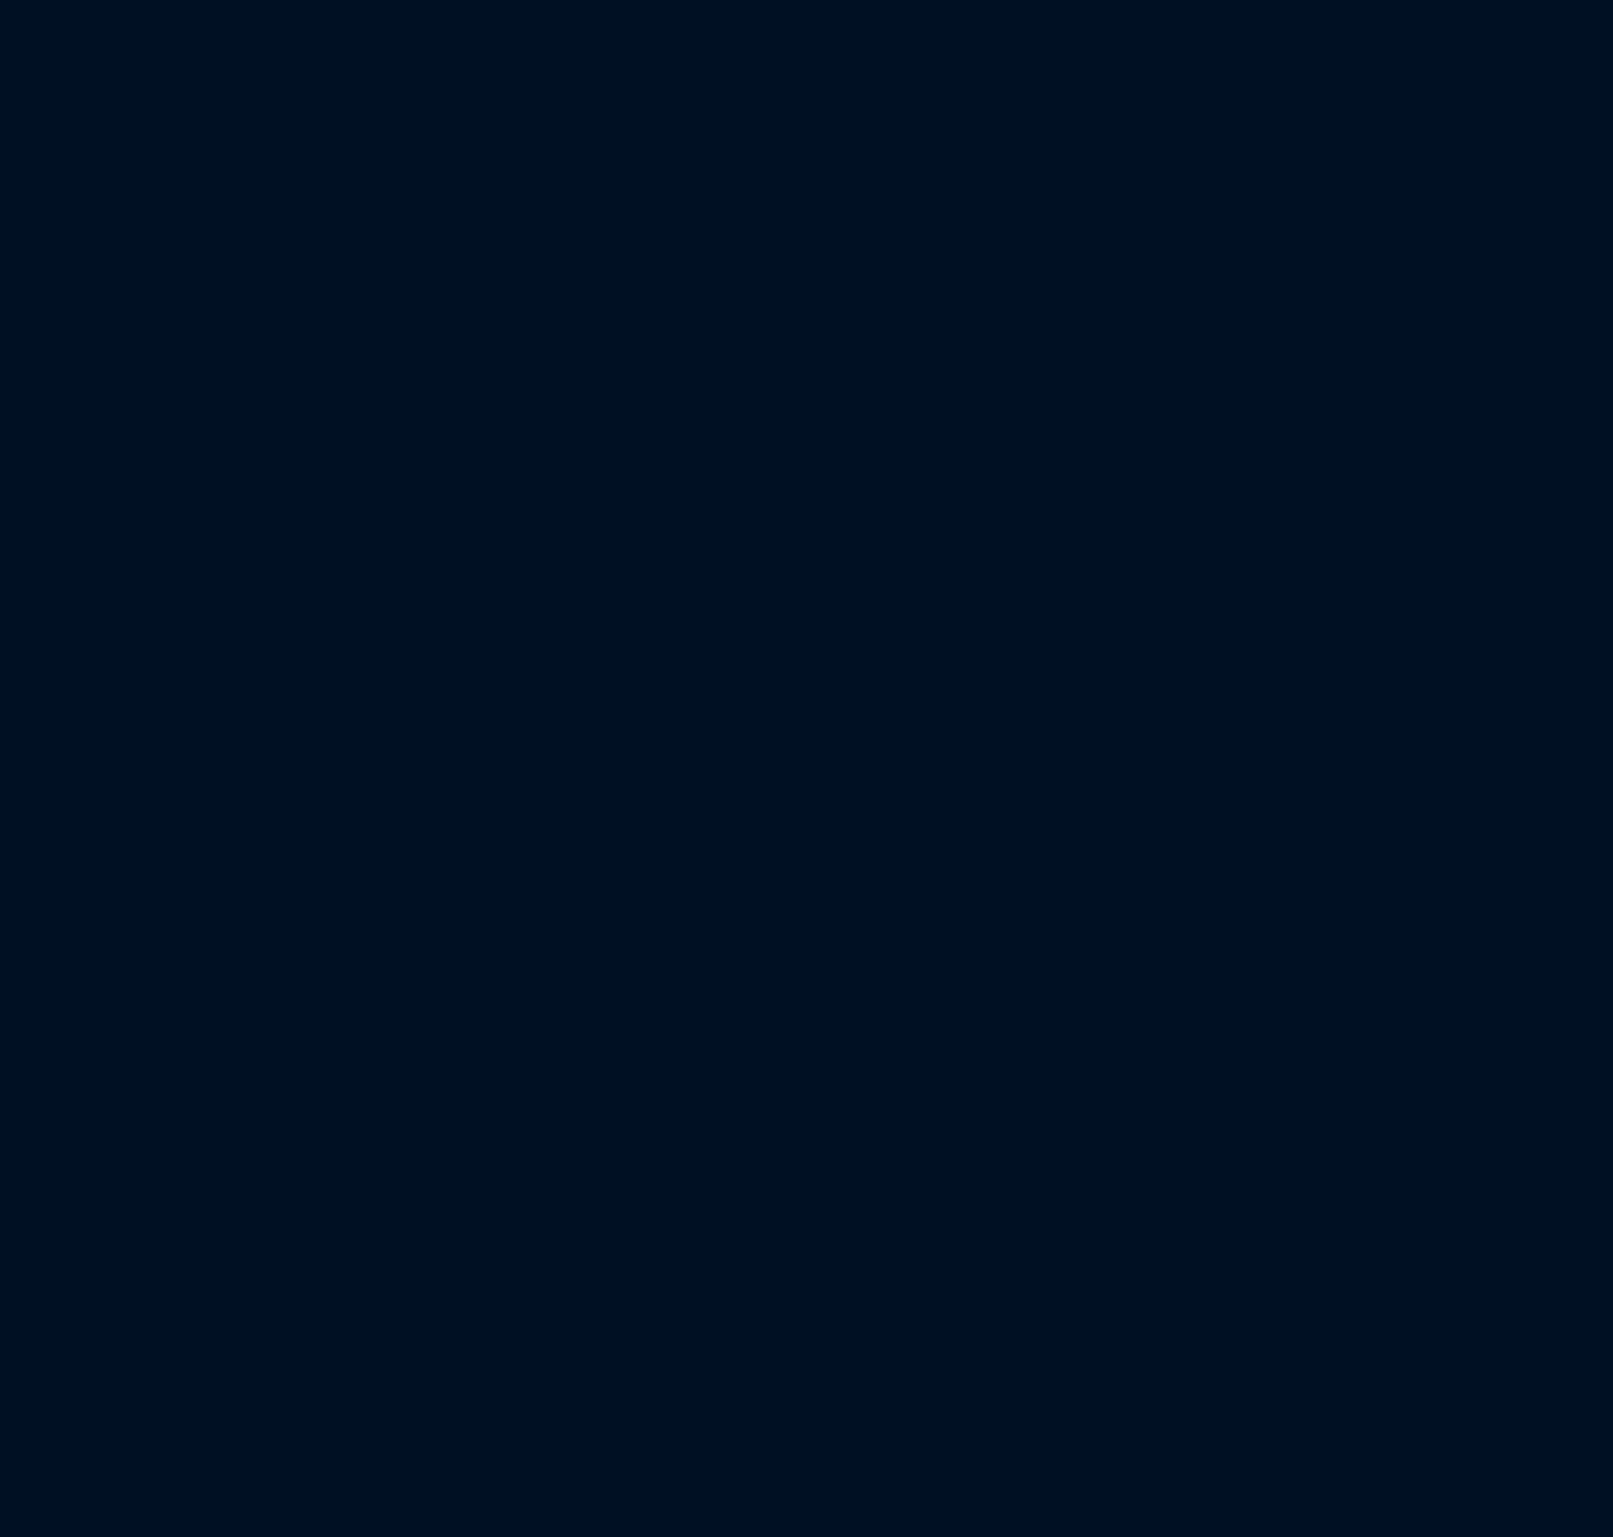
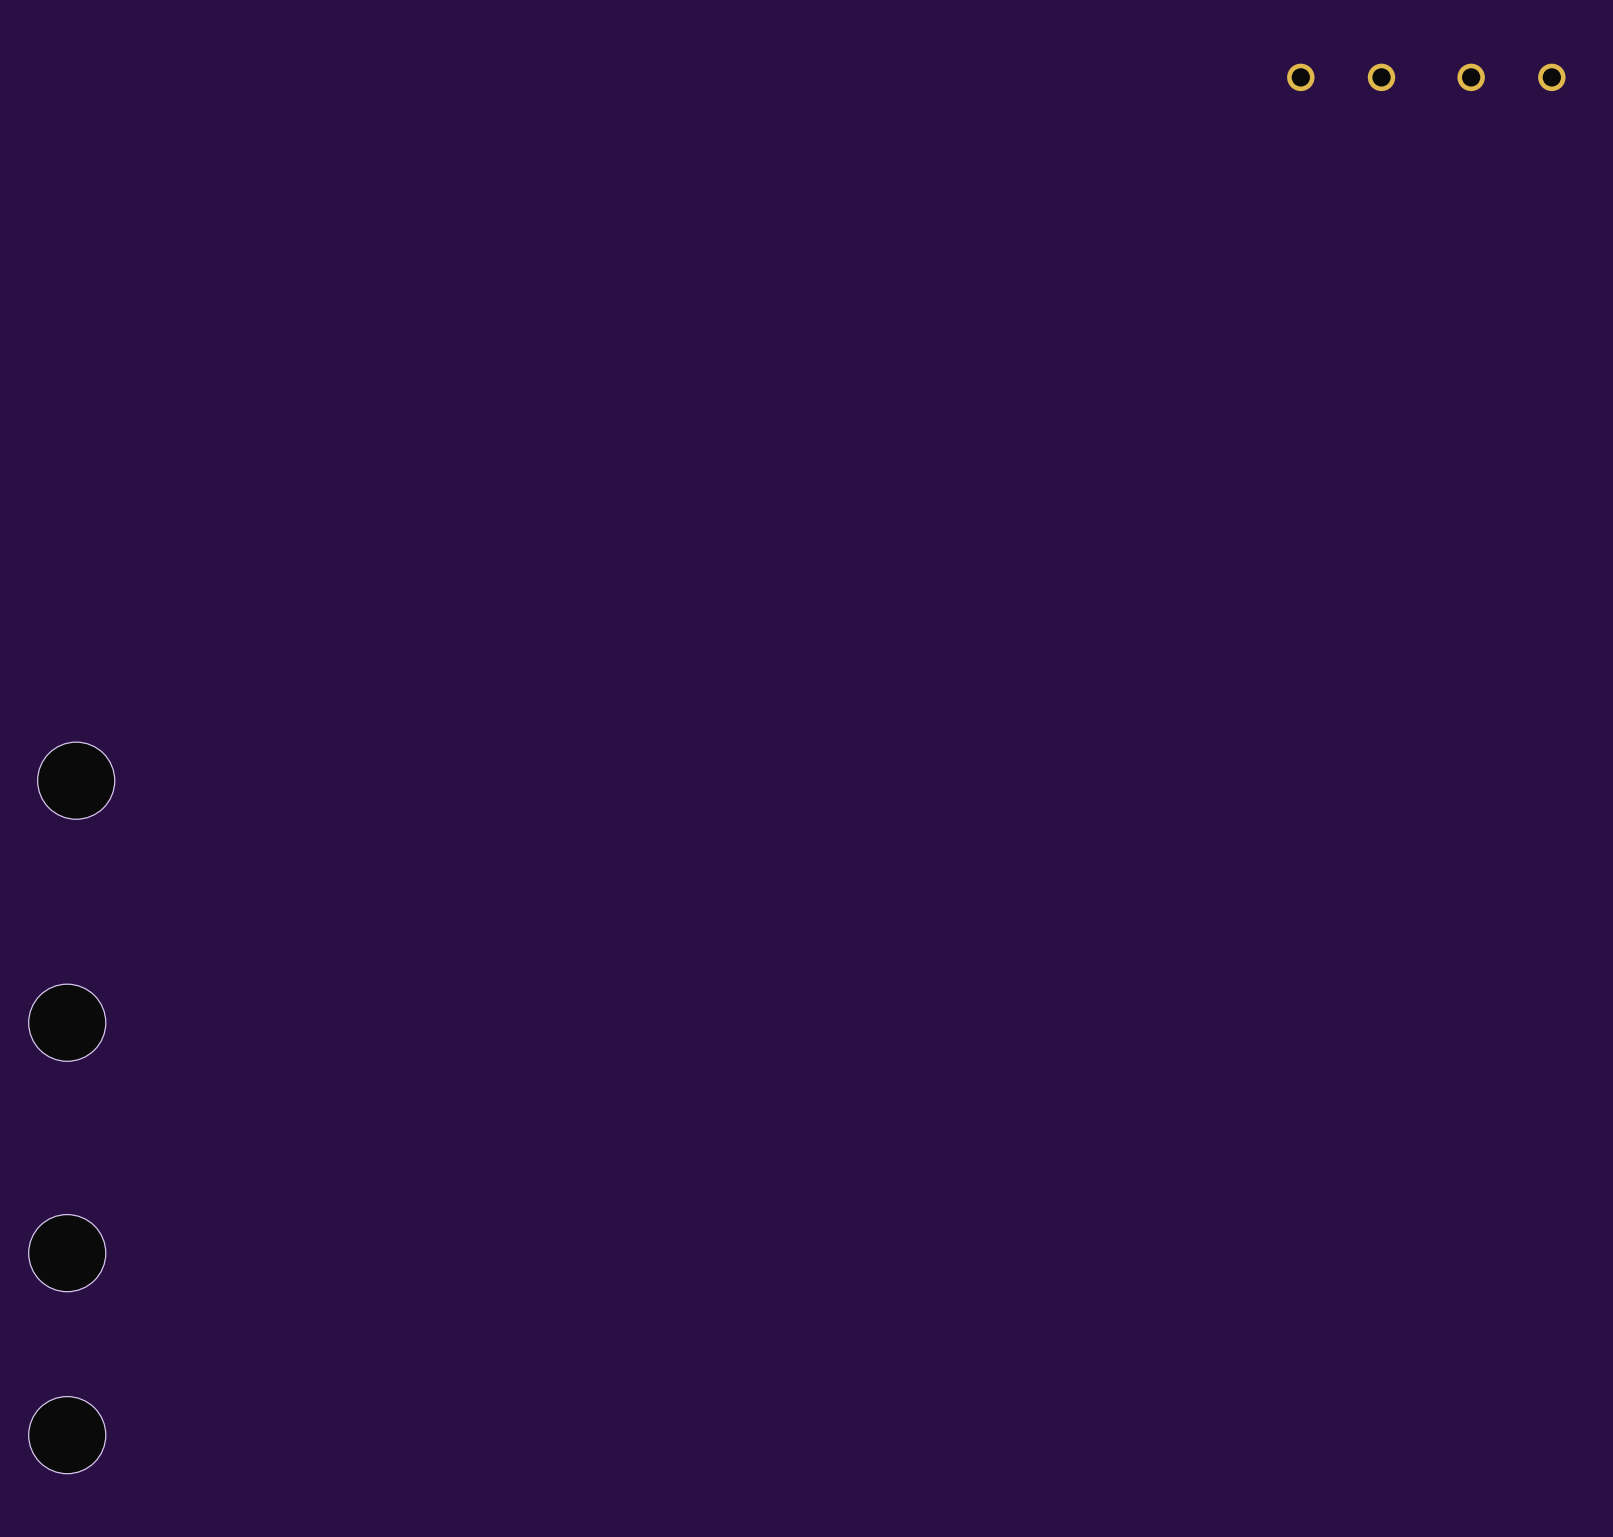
part: none -> (1300, 77)
part: none -> (1381, 77)
part: none -> (1471, 77)
part: none -> (1551, 77)
part: none -> (76, 780)
part: none -> (67, 1022)
part: none -> (67, 1253)
part: none -> (67, 1435)

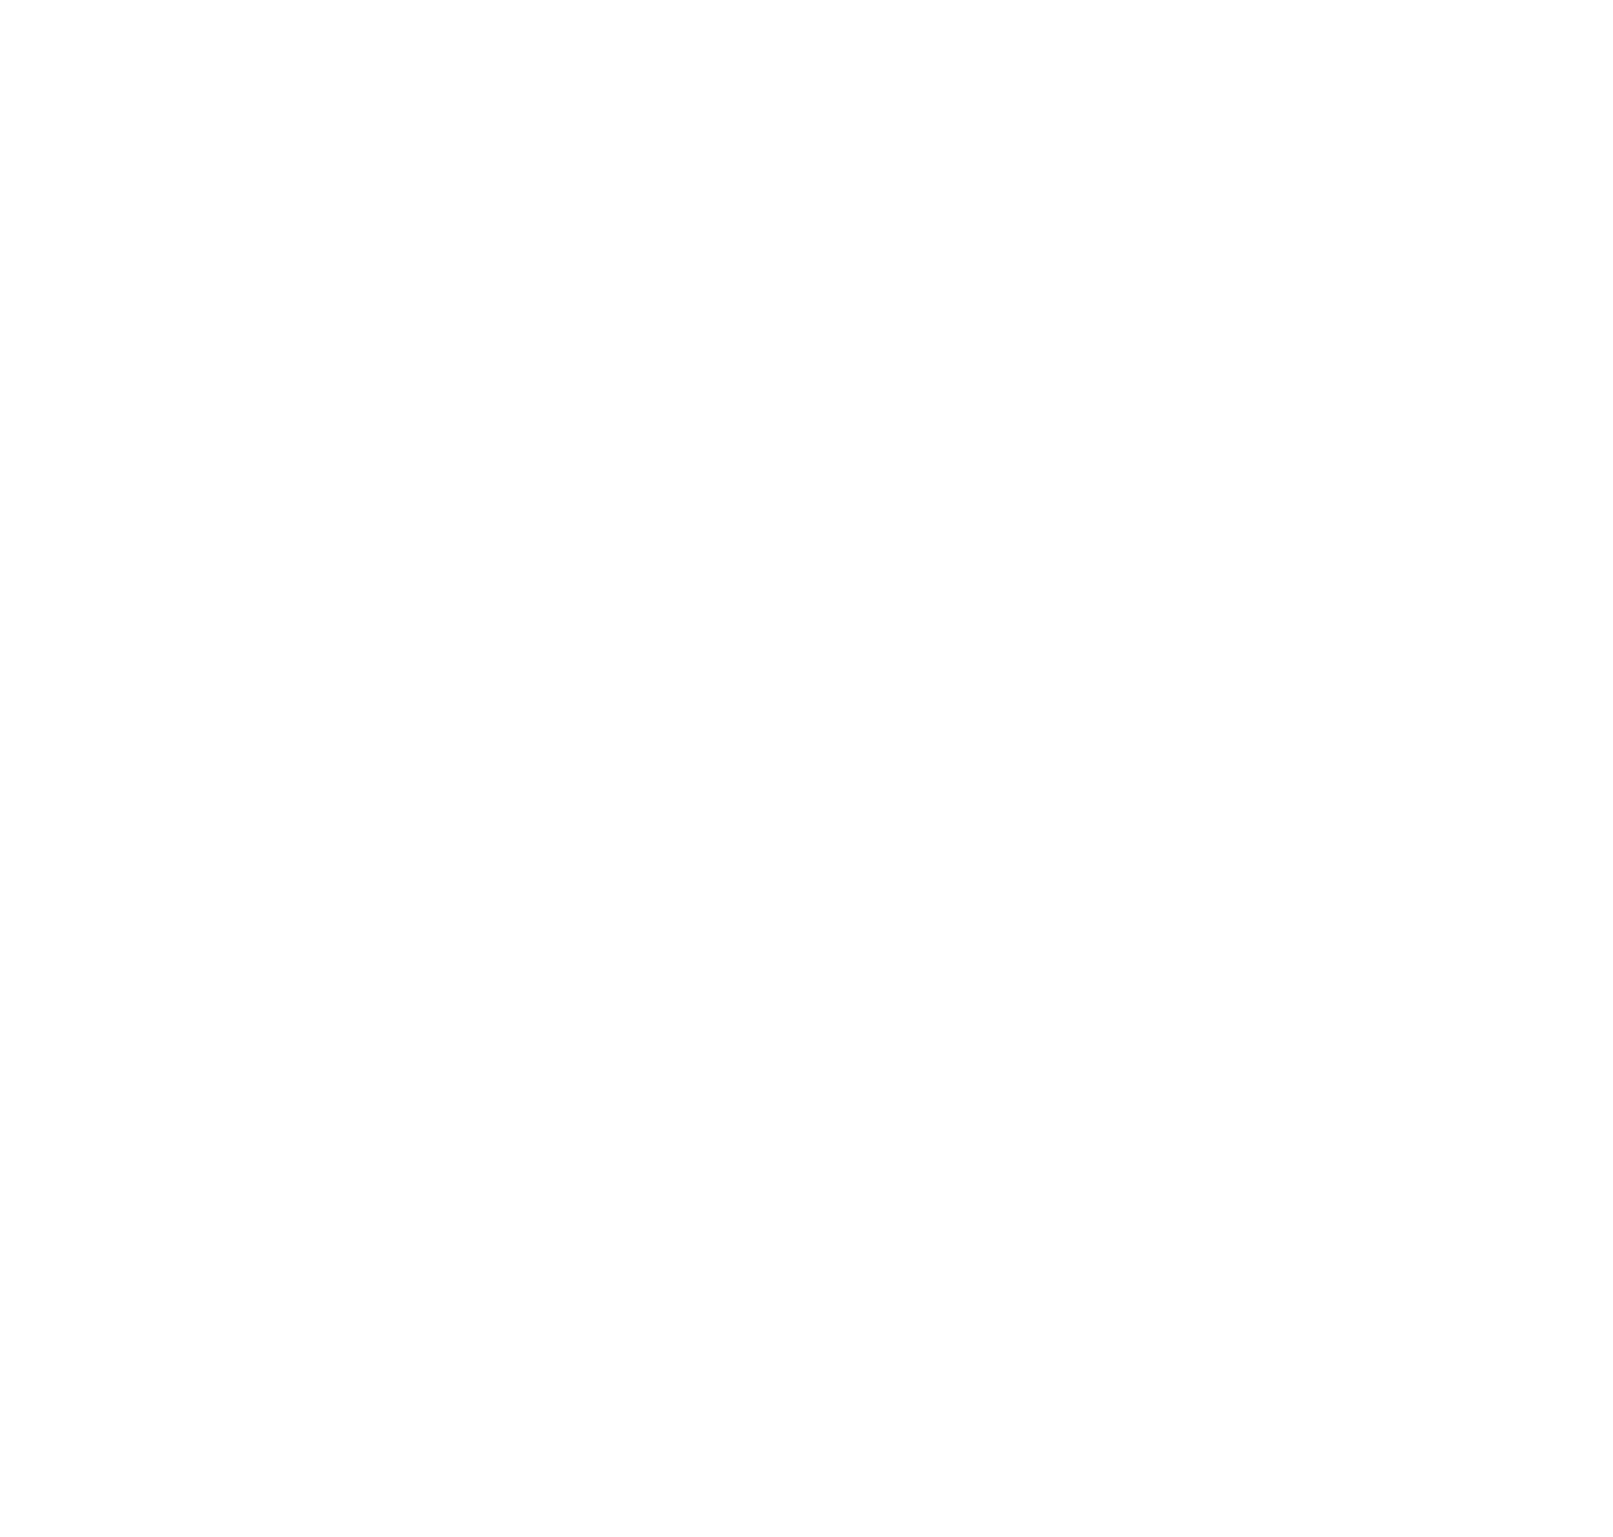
part: (1300, 77) -> none
part: (1381, 77) -> none
part: (1471, 77) -> none
part: (1551, 77) -> none
part: (76, 780) -> none
part: (67, 1022) -> none
part: (67, 1253) -> none
part: (67, 1435) -> none

